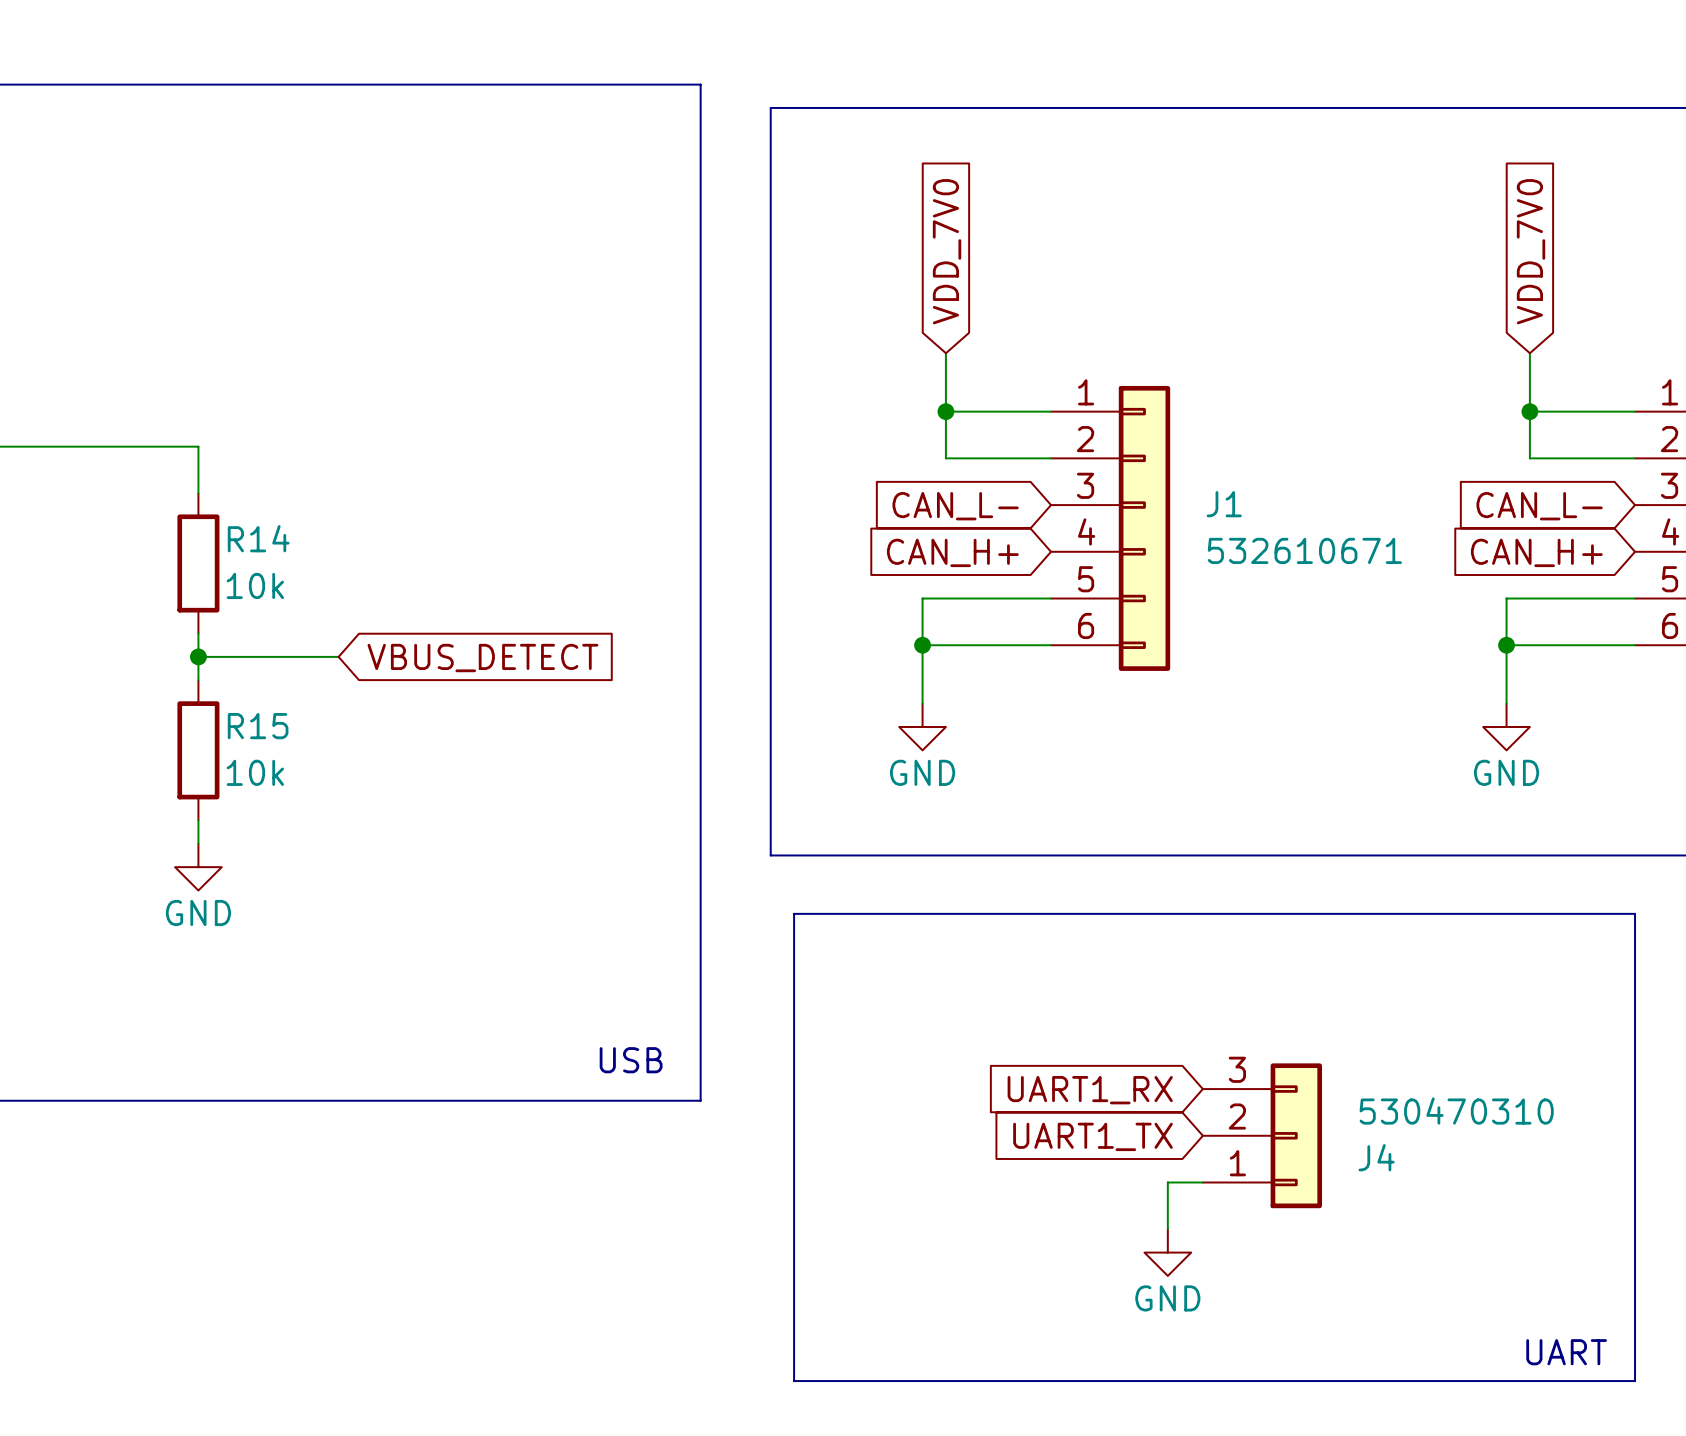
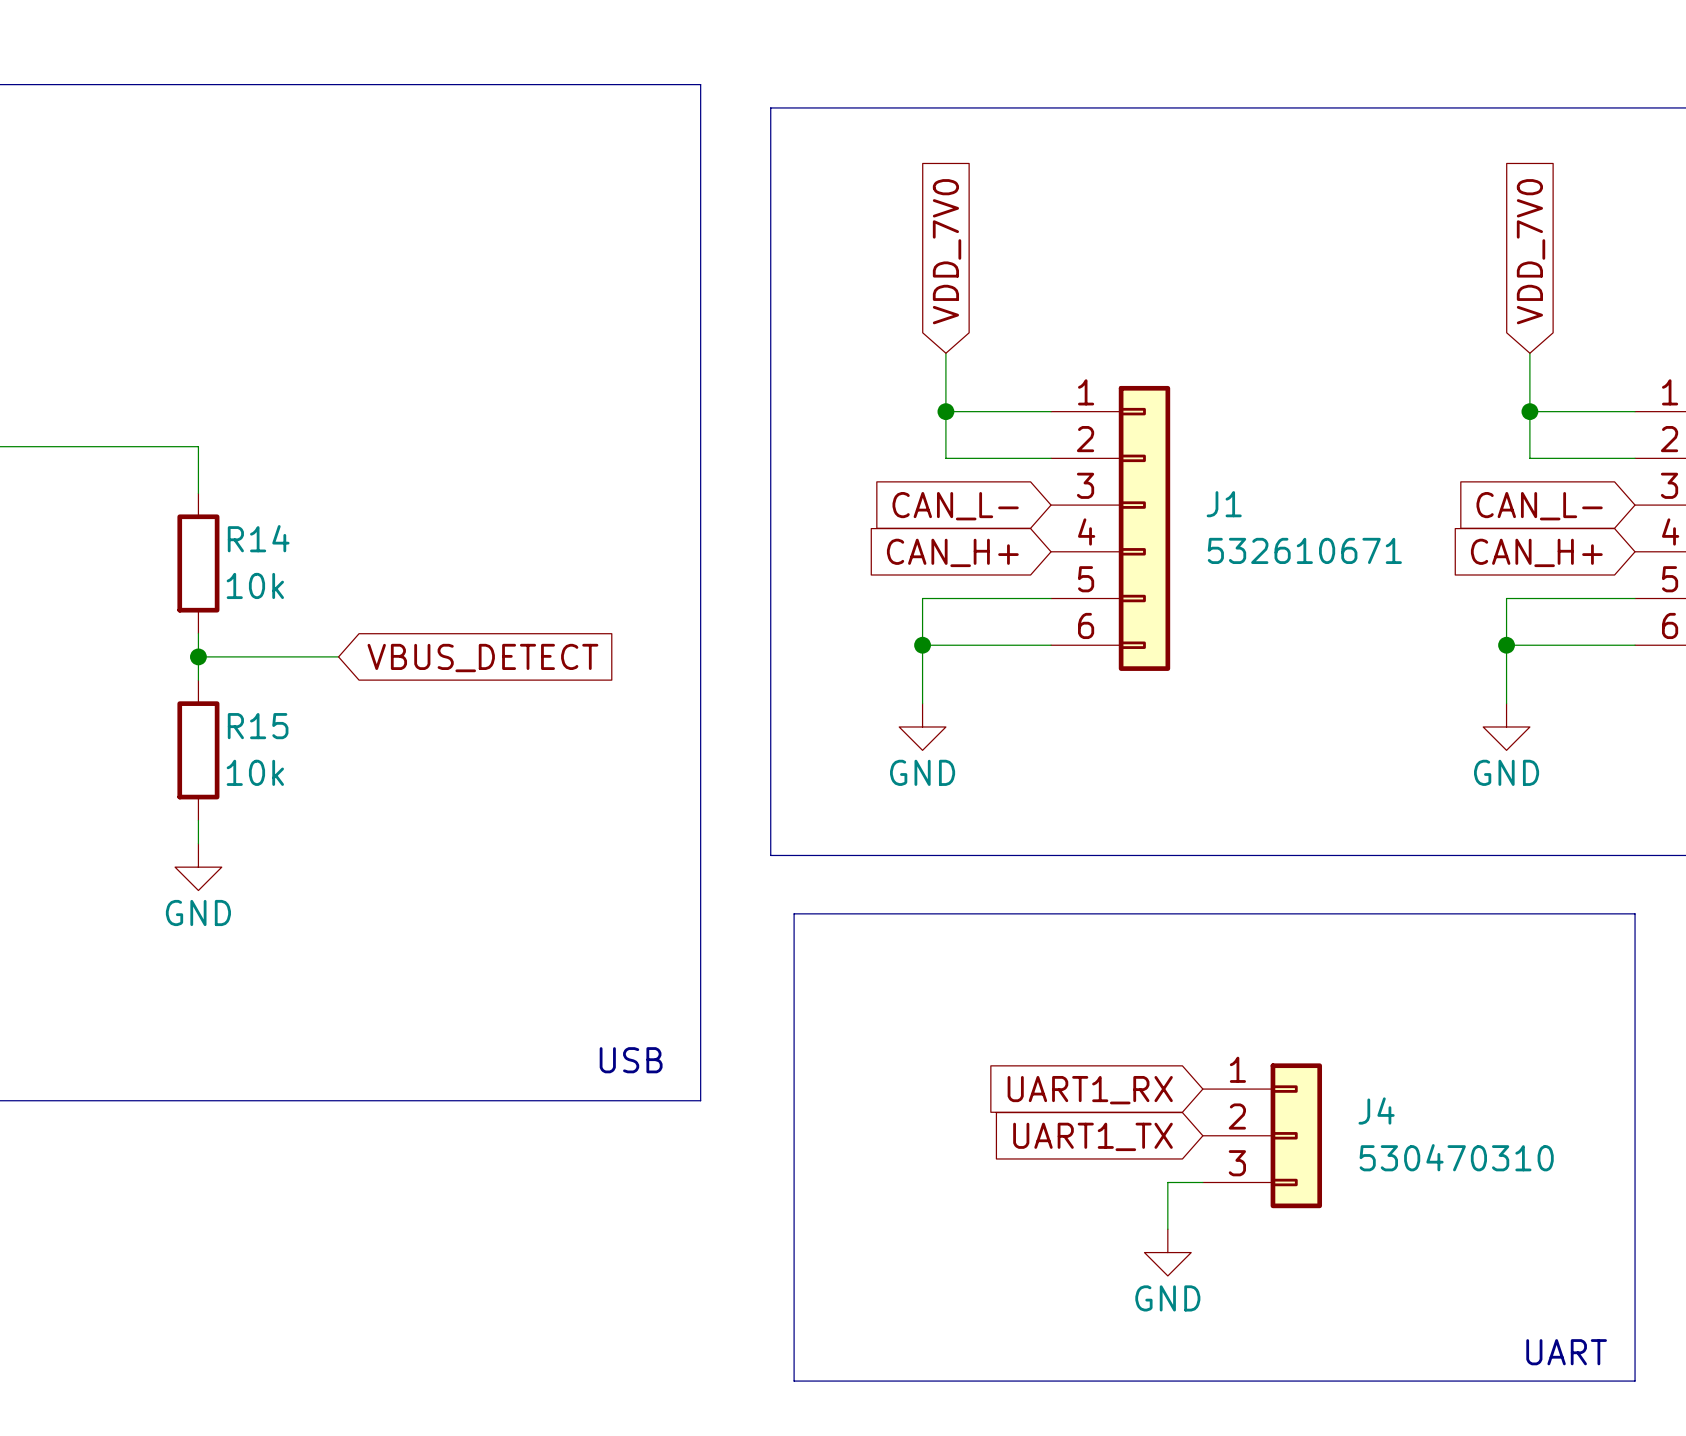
J4 flip: as is (1296, 1135) -> up-down (1296, 1135)

